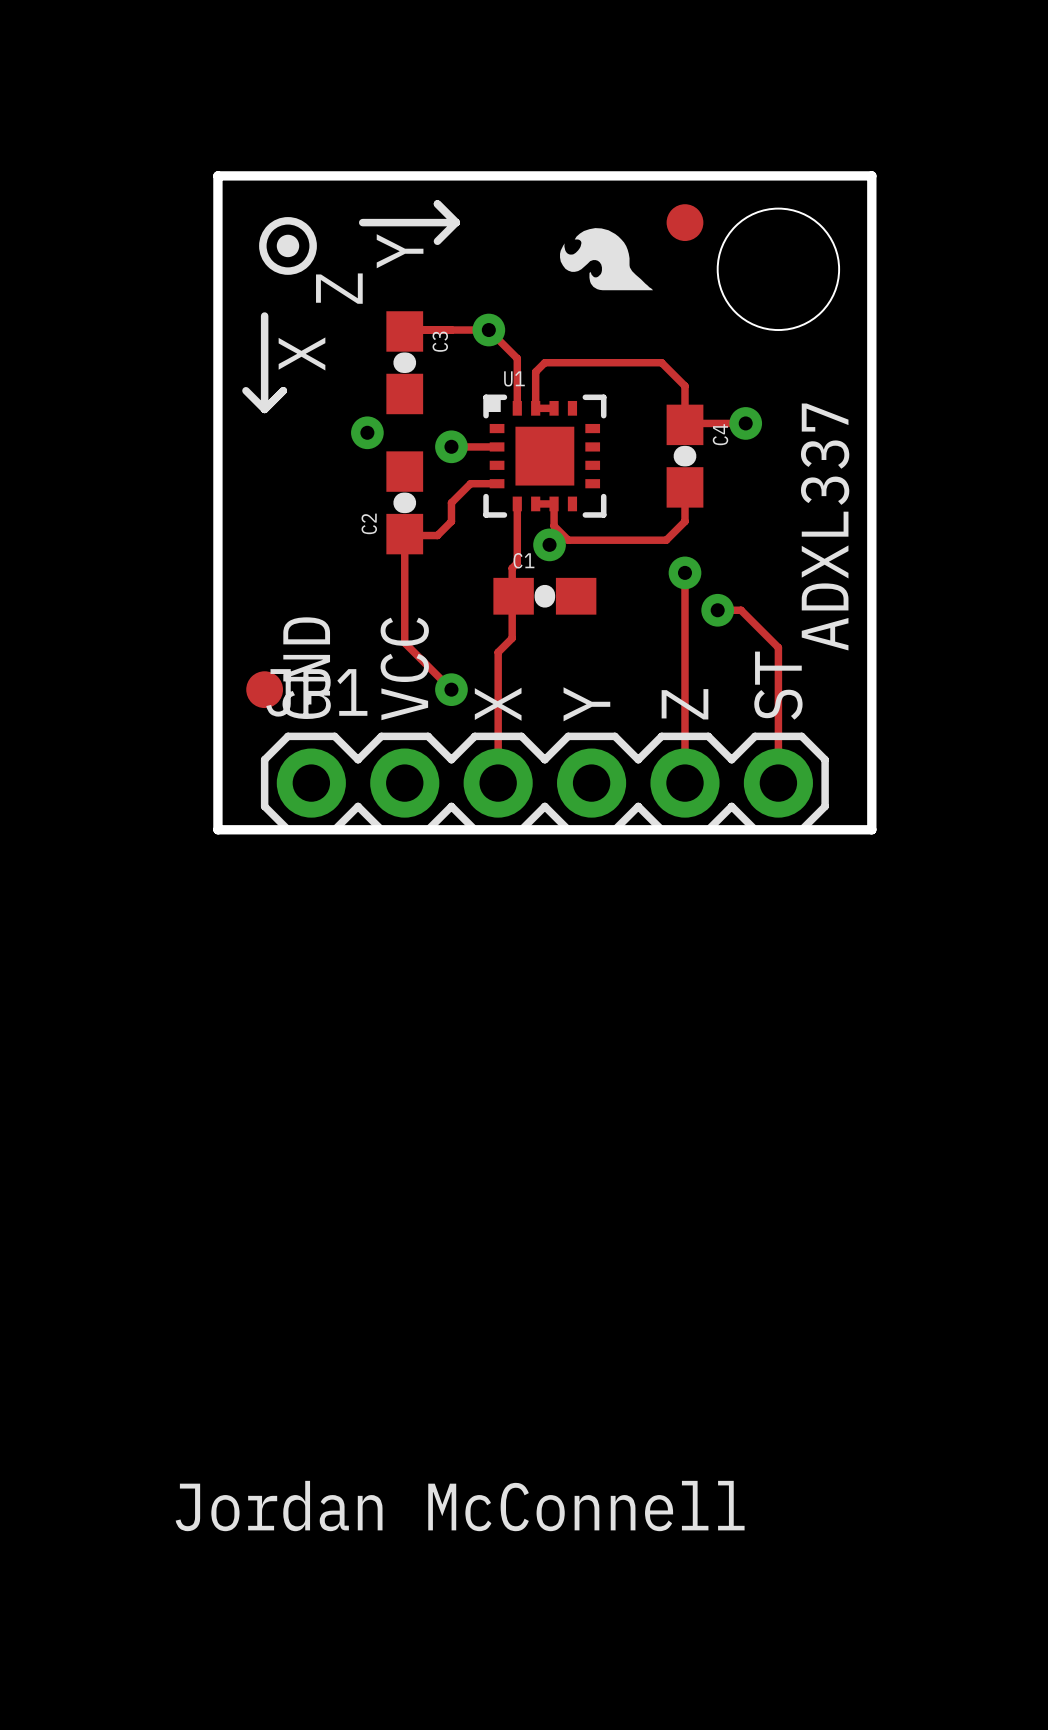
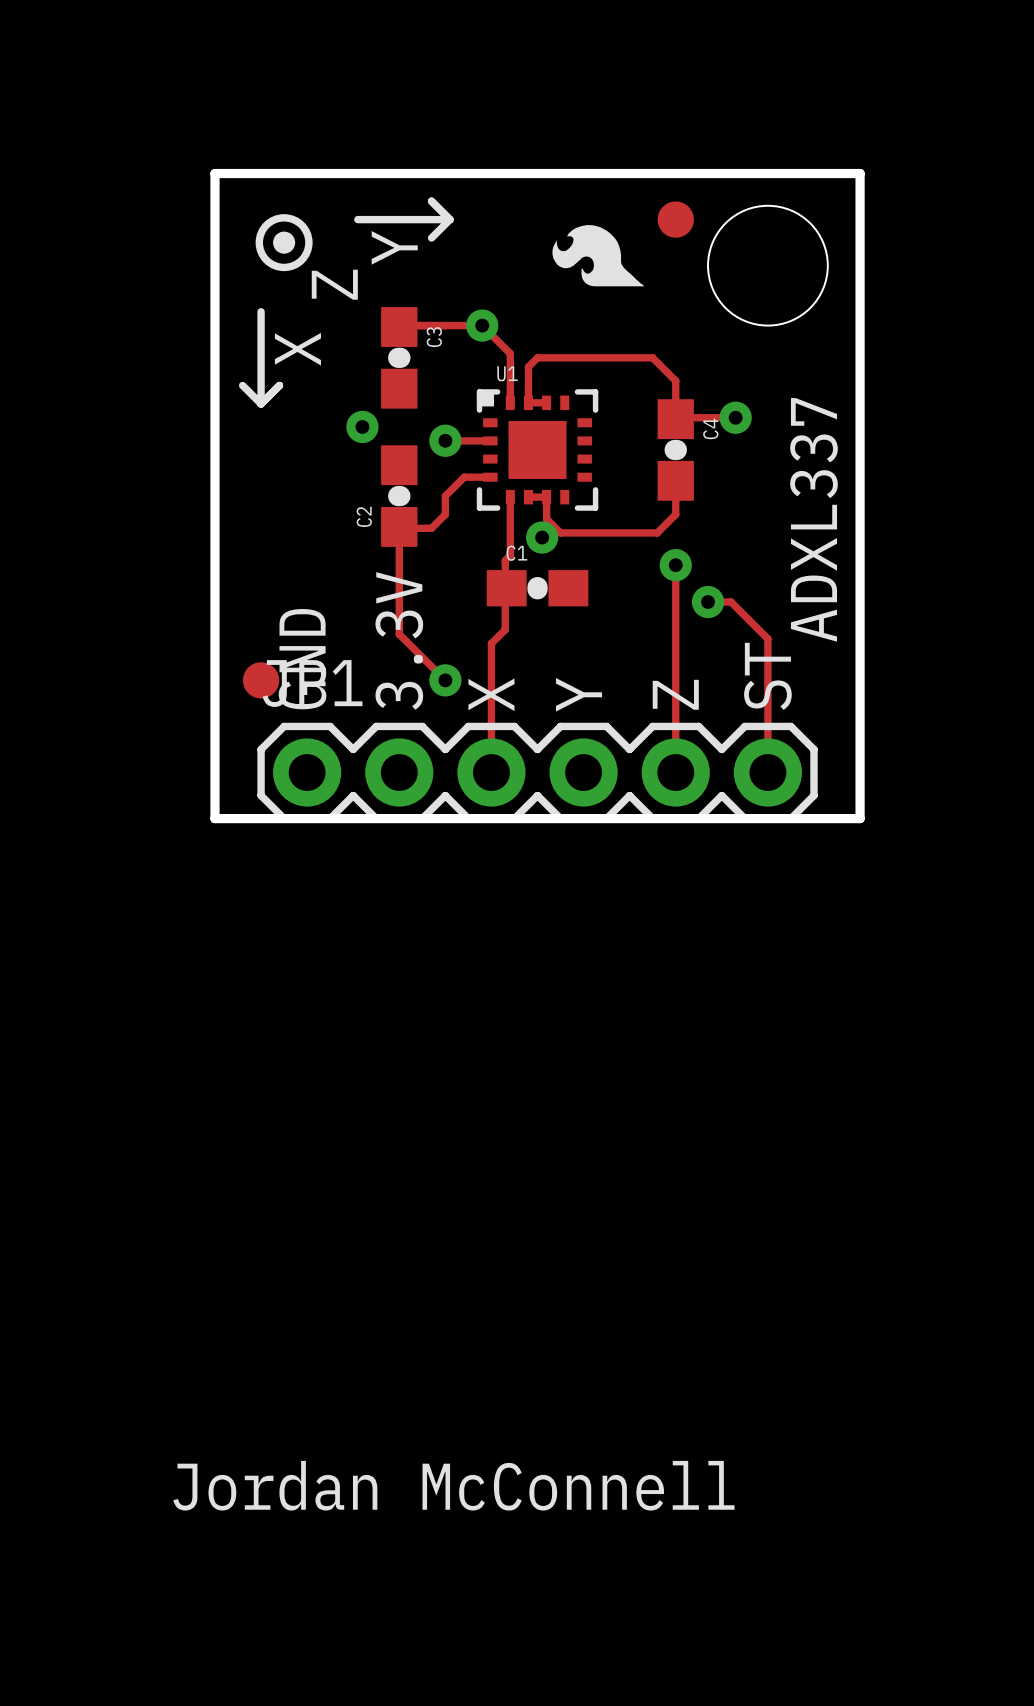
text: VCC (404, 668) -> 3.3V (399, 640)

